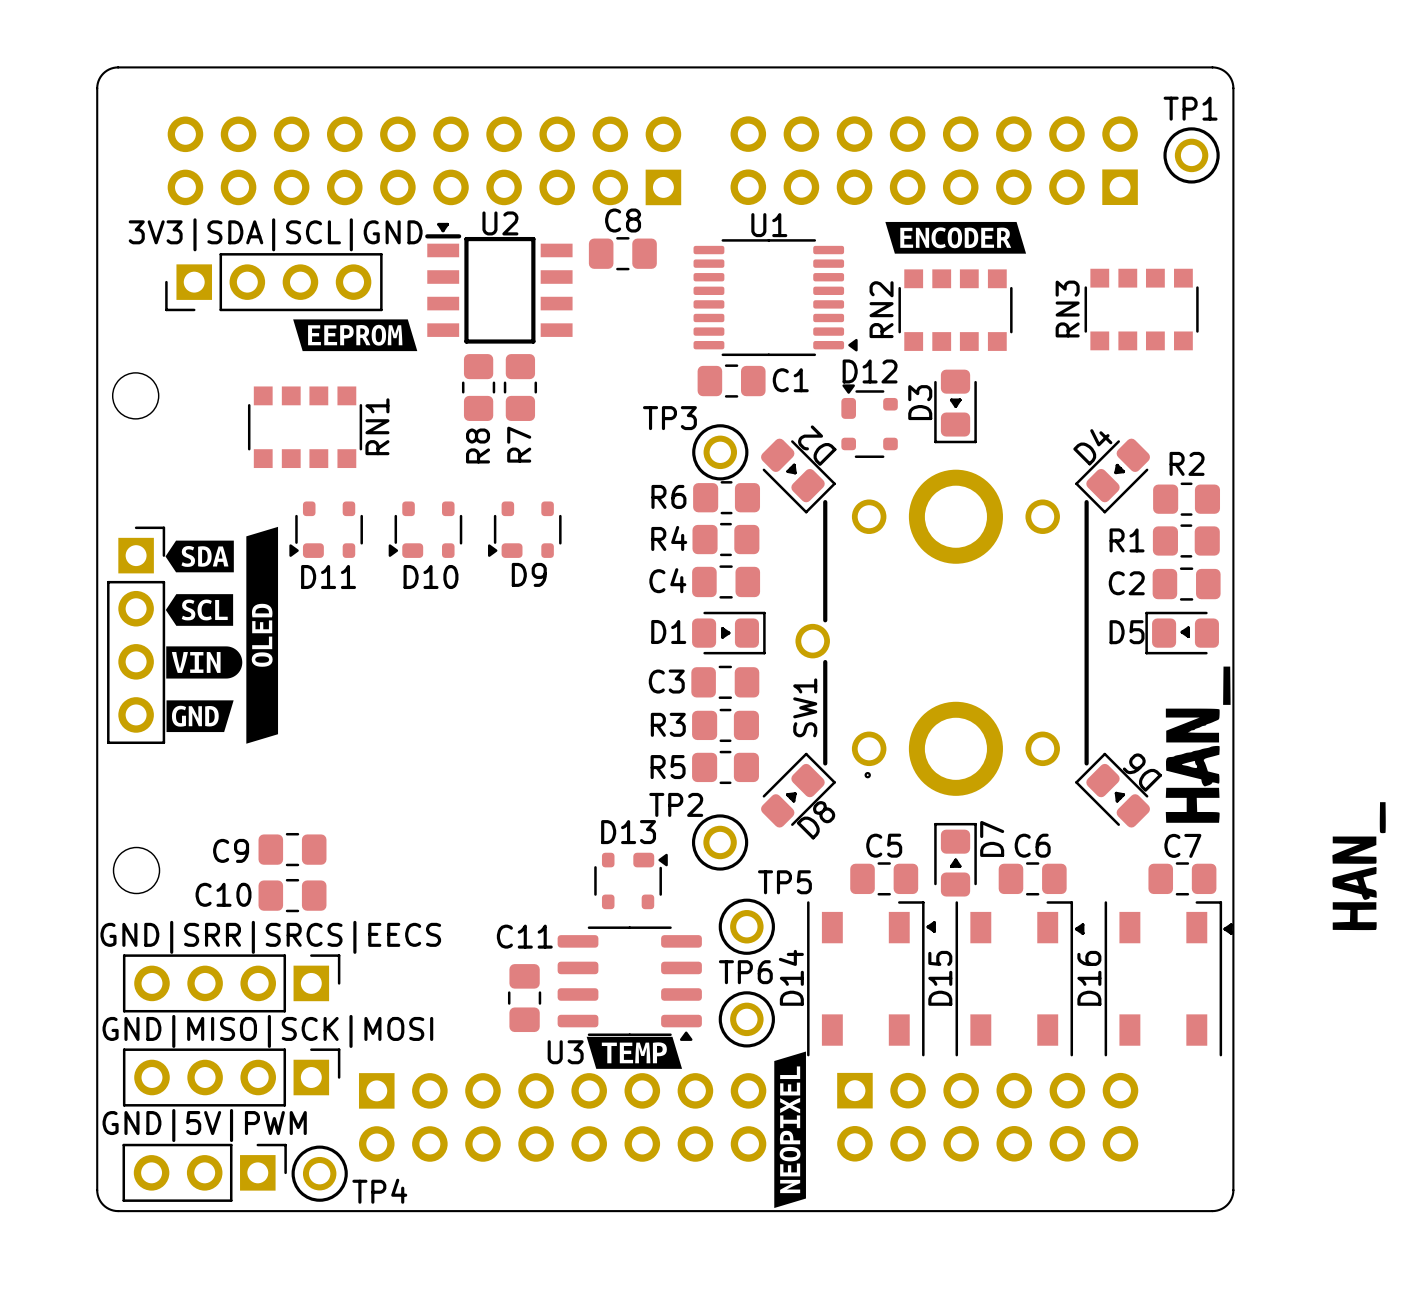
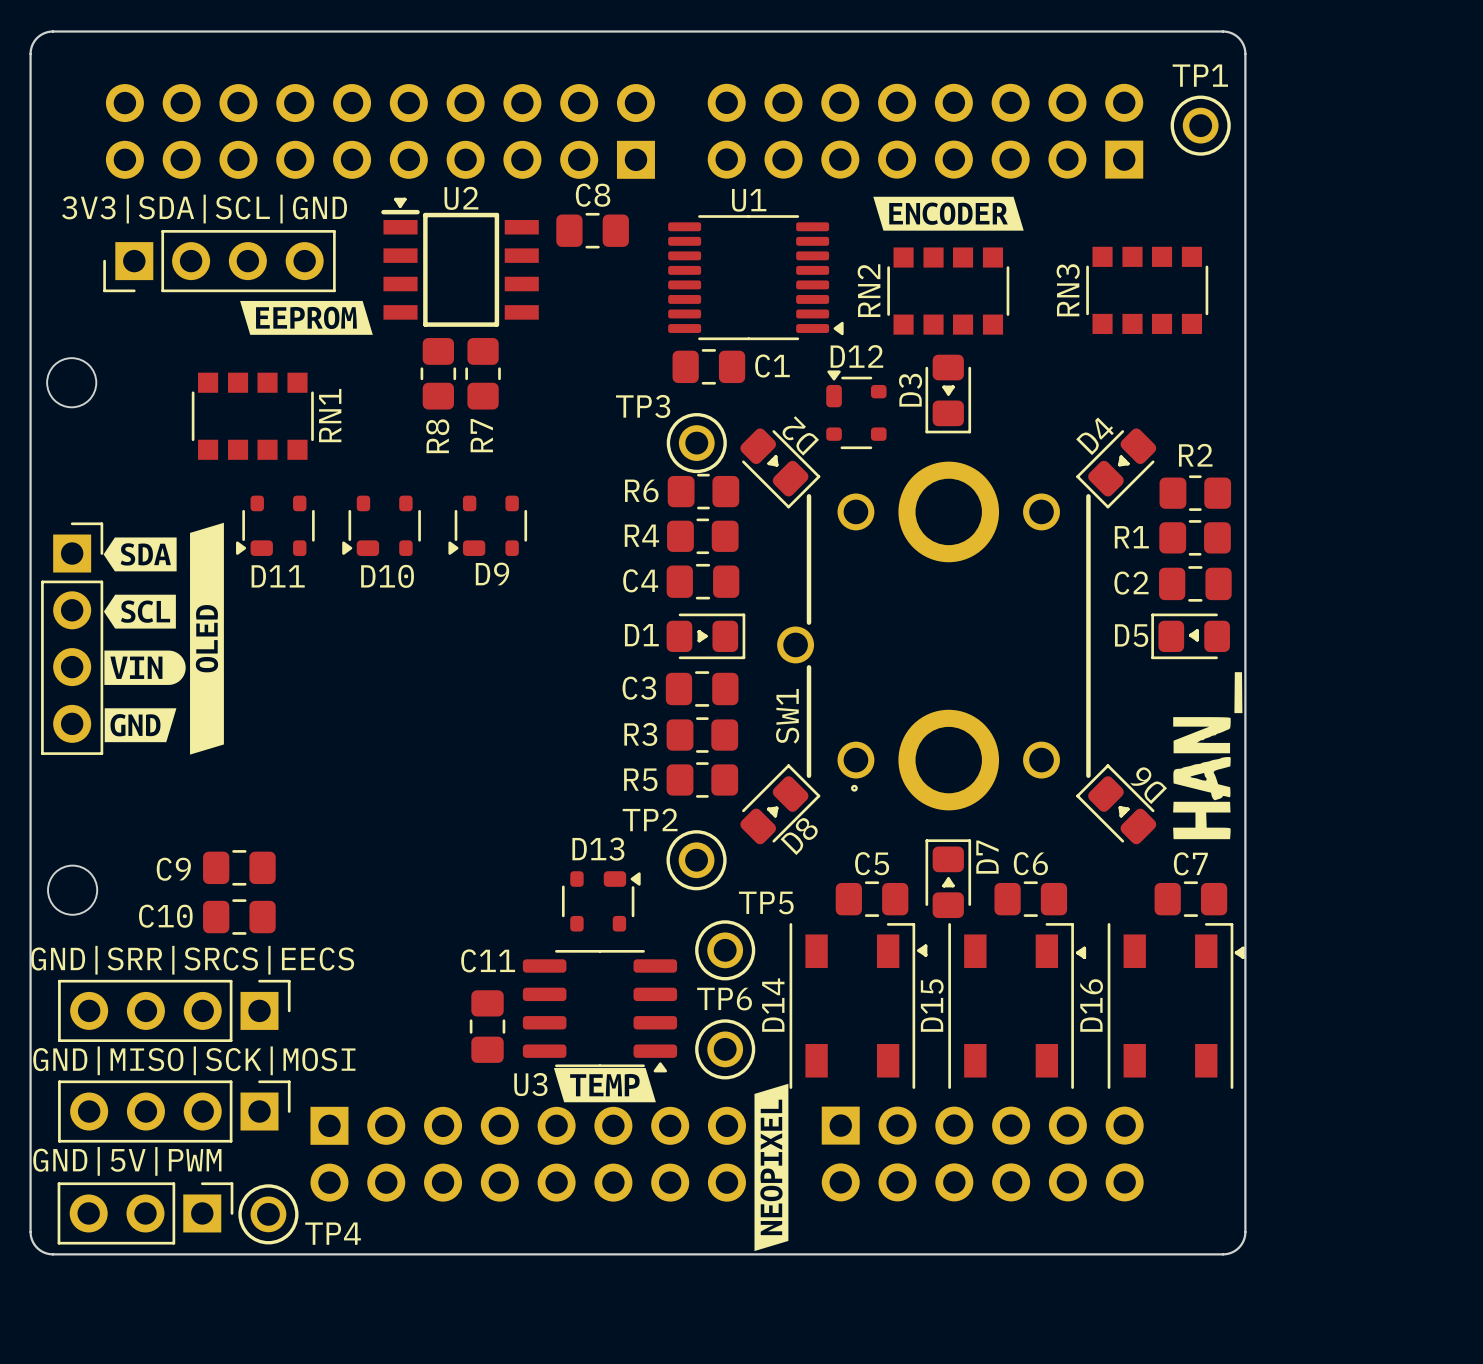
drawing: [1332, 802, 1386, 931] -> none

